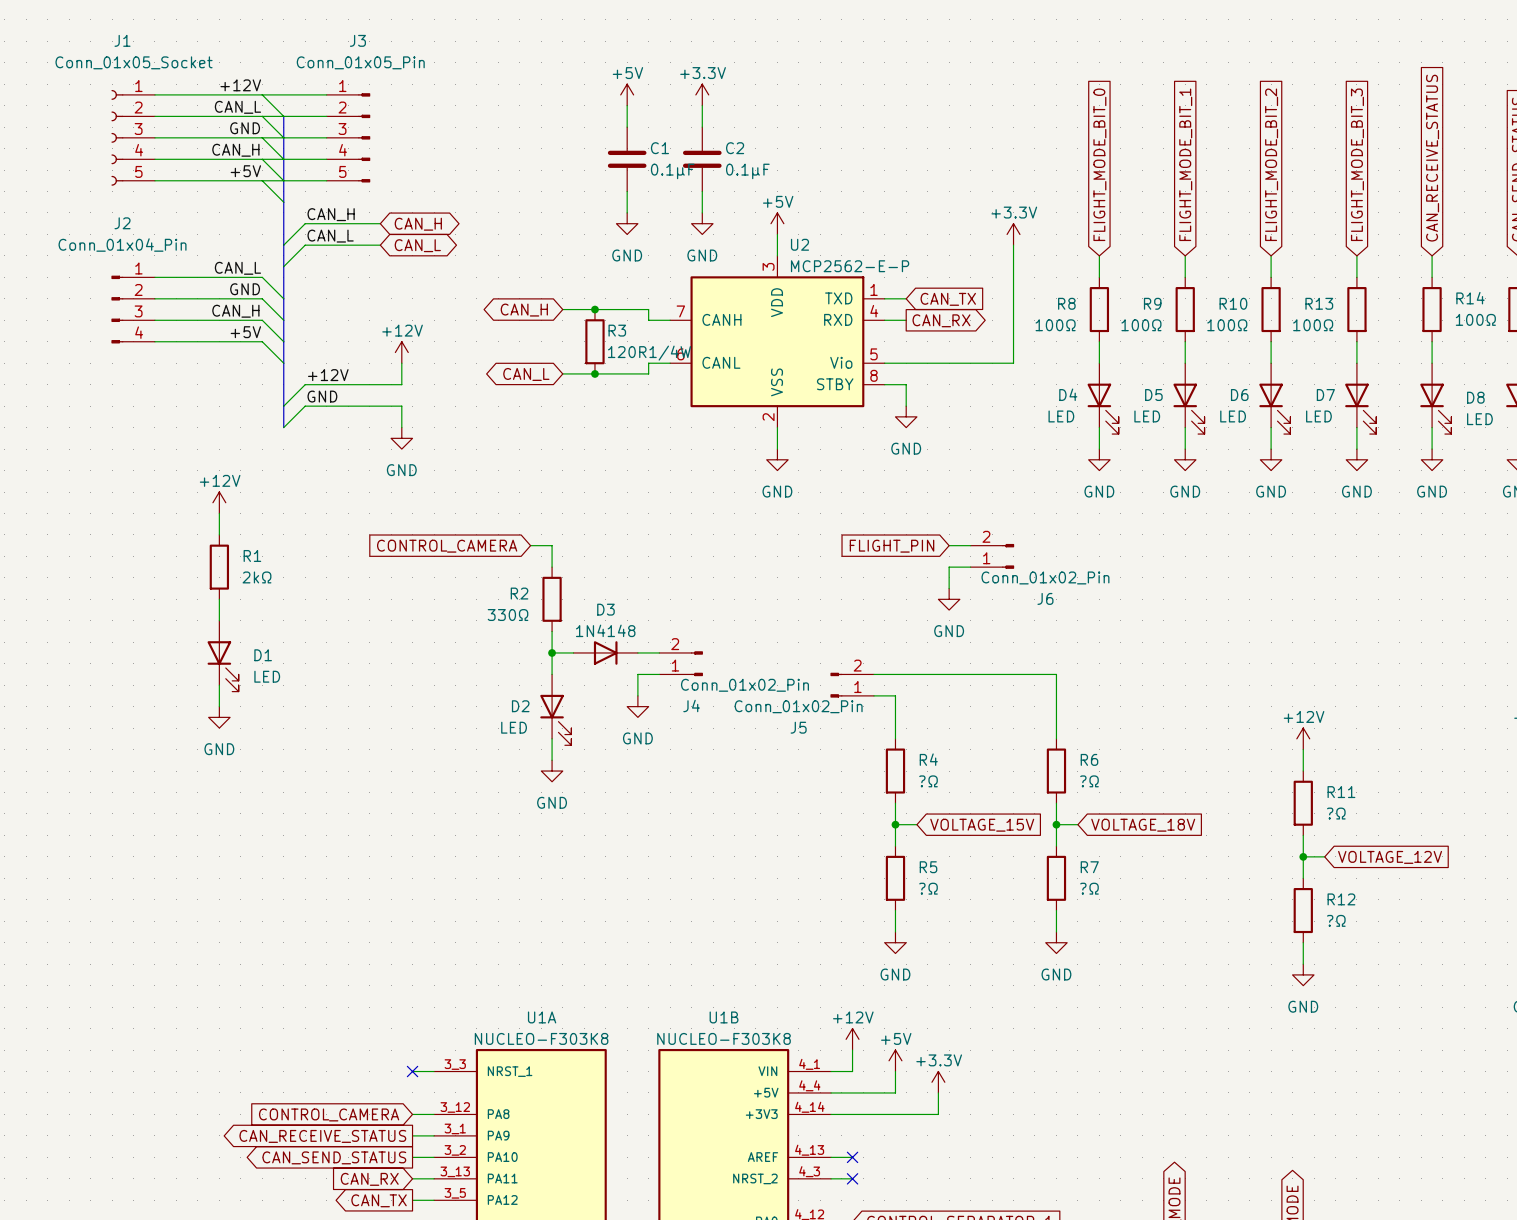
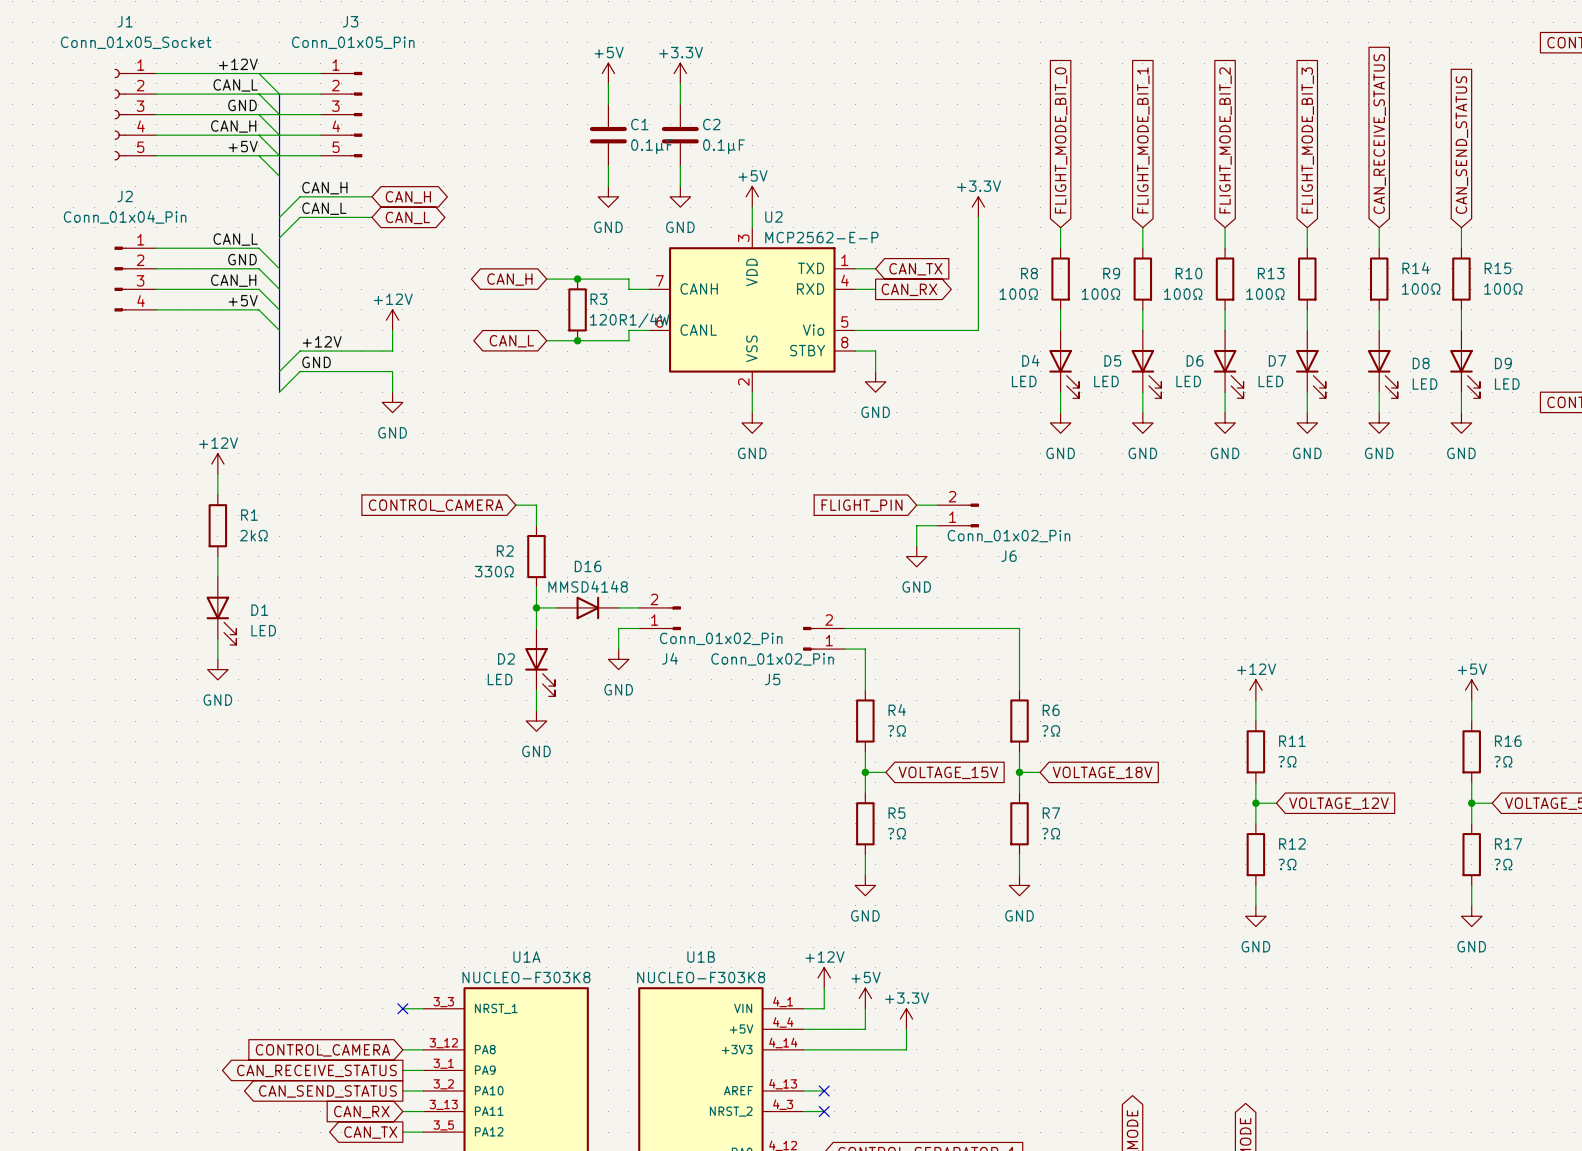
D3 name: D3 (605, 609) -> D16 (588, 566)
D3 value: 1N4148 (605, 630) -> MMSD4148 (588, 586)

